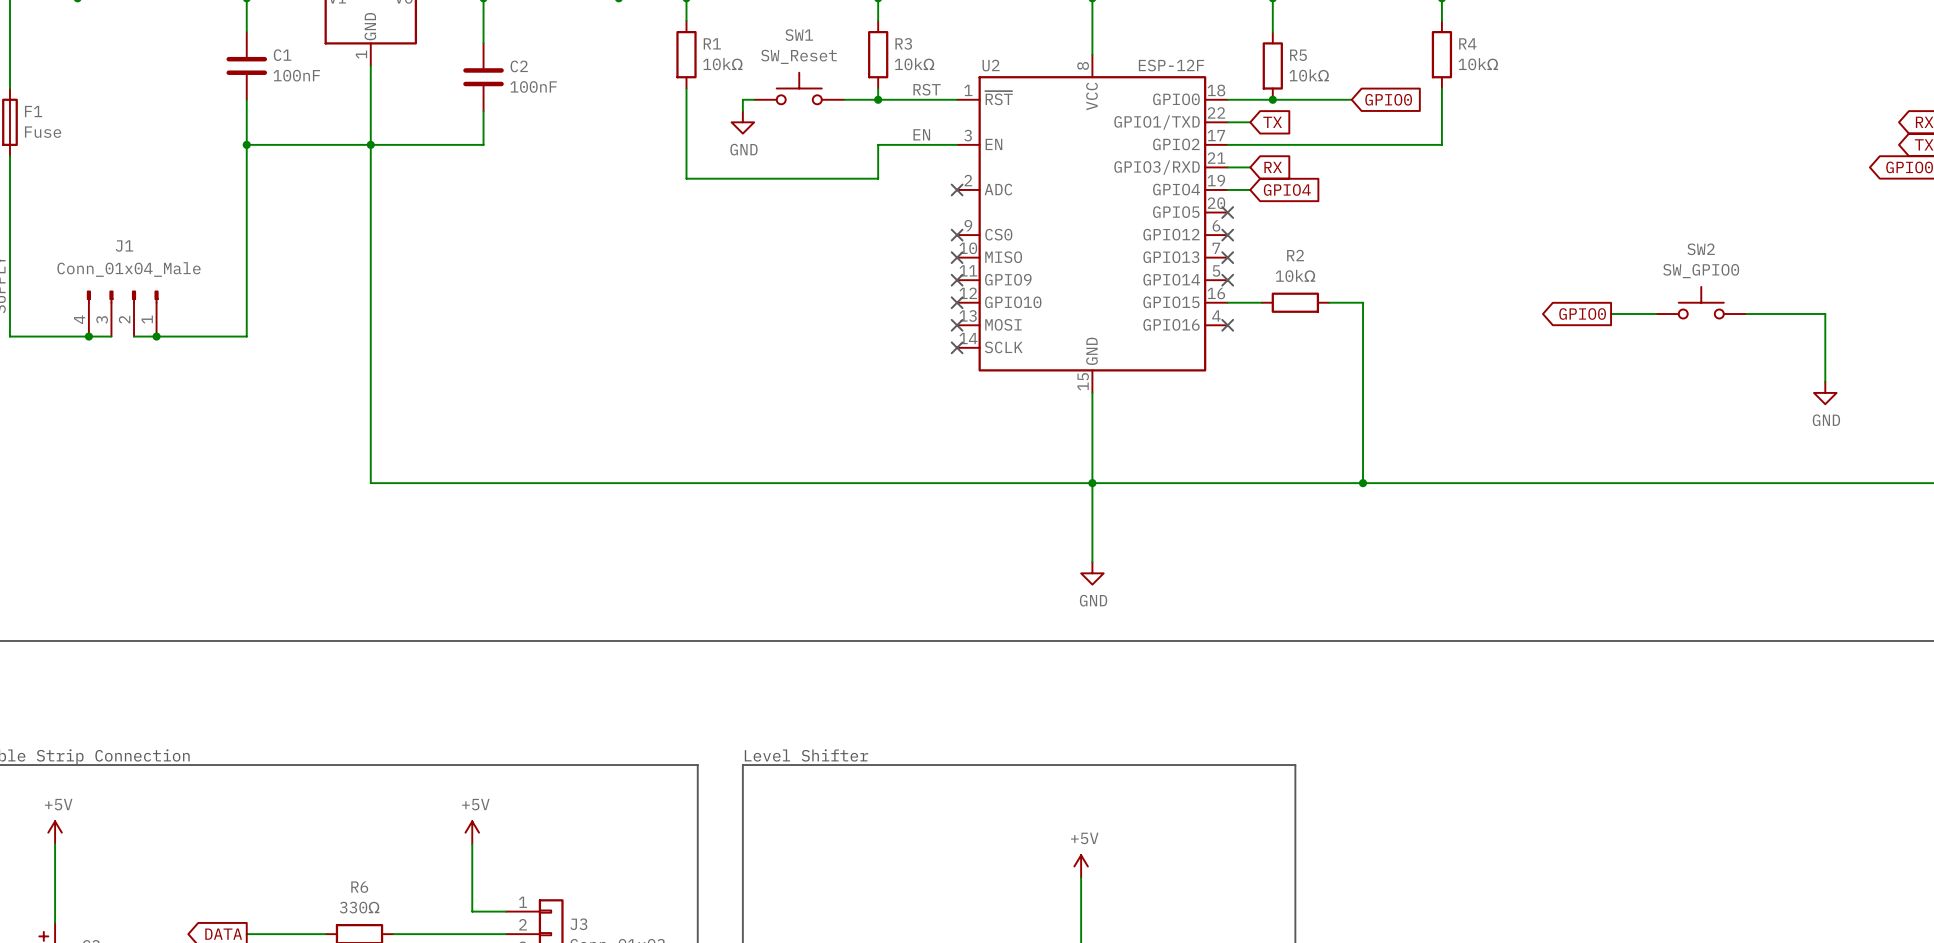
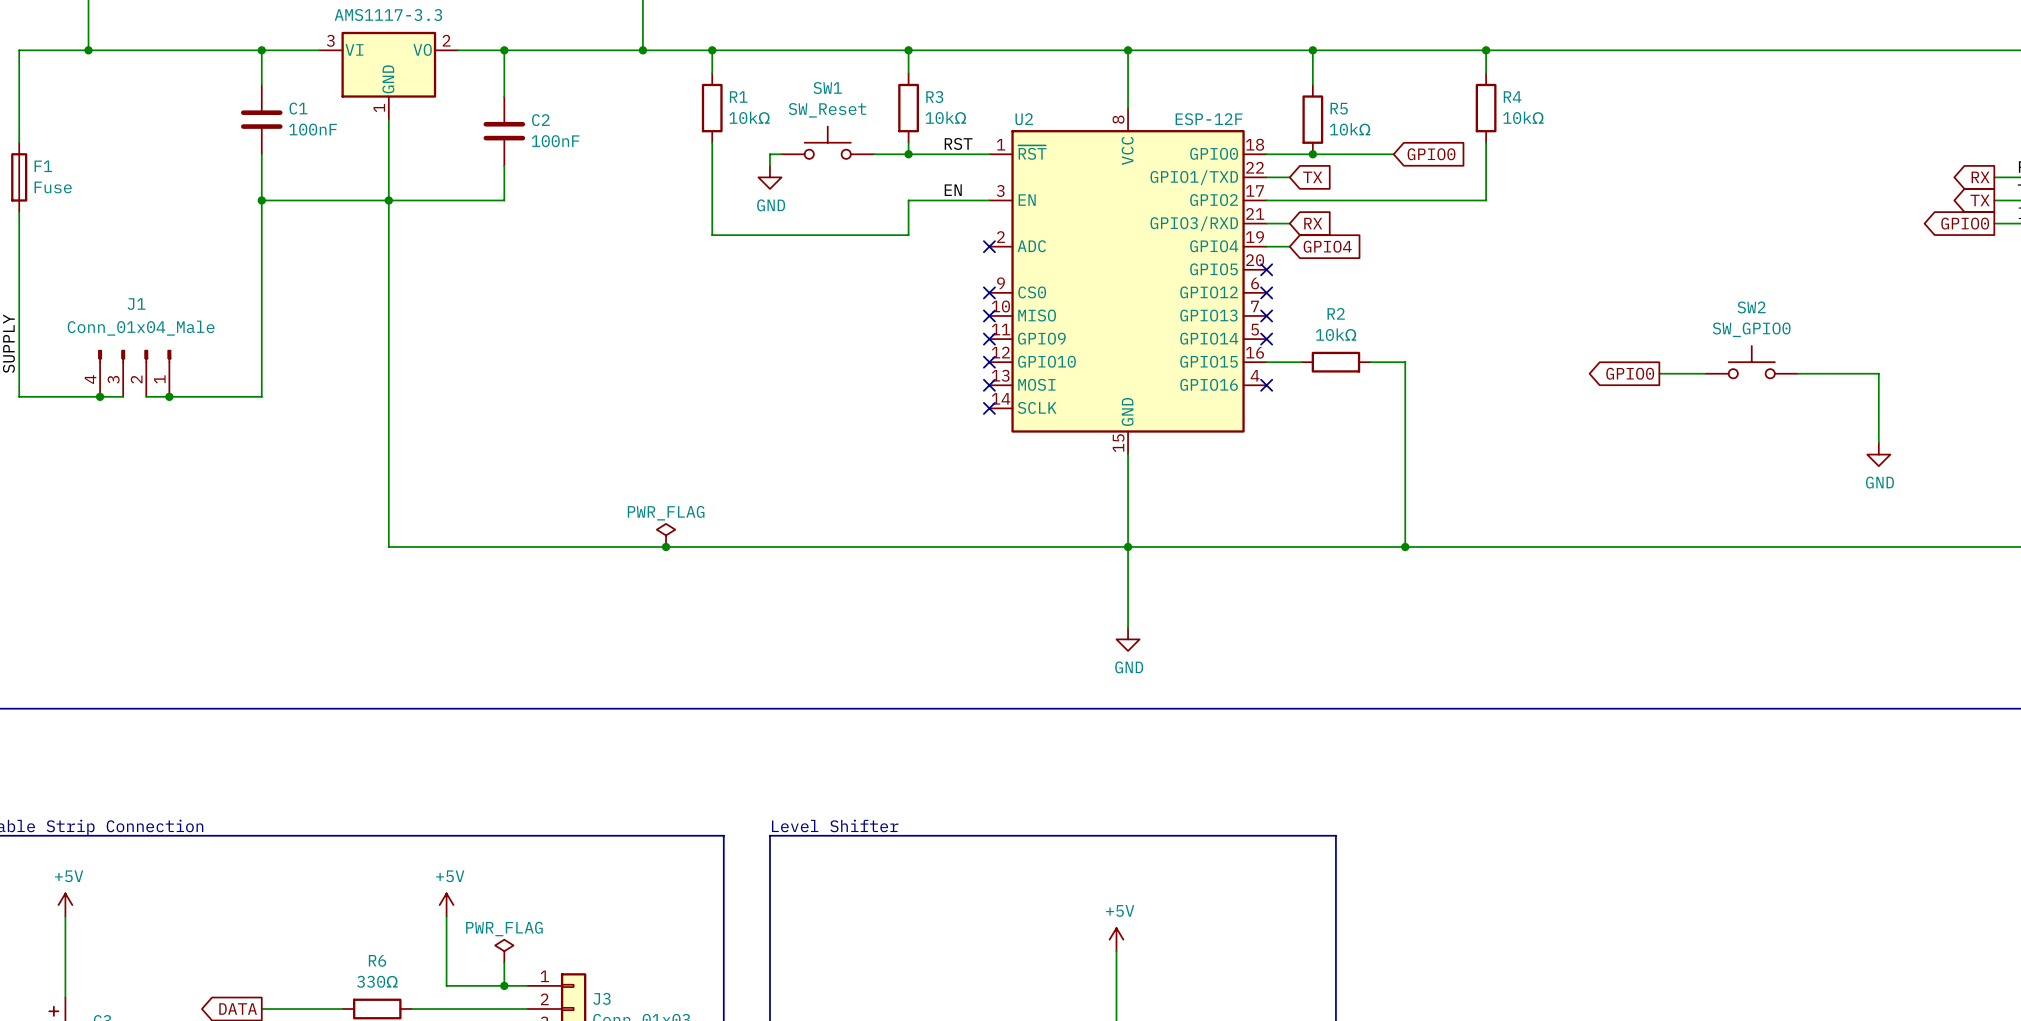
power symbol: none -> PWR_FLAG (666, 535)
junction: none -> (666, 546)
power symbol position: +5V (472, 832) -> +5V (446, 905)
wire: (472, 843) (472, 911) -> (446, 916) (446, 985) (492, 985)
power symbol: none -> PWR_FLAG (504, 951)
wire: none -> (504, 962) (504, 985)
junction: none -> (504, 985)

